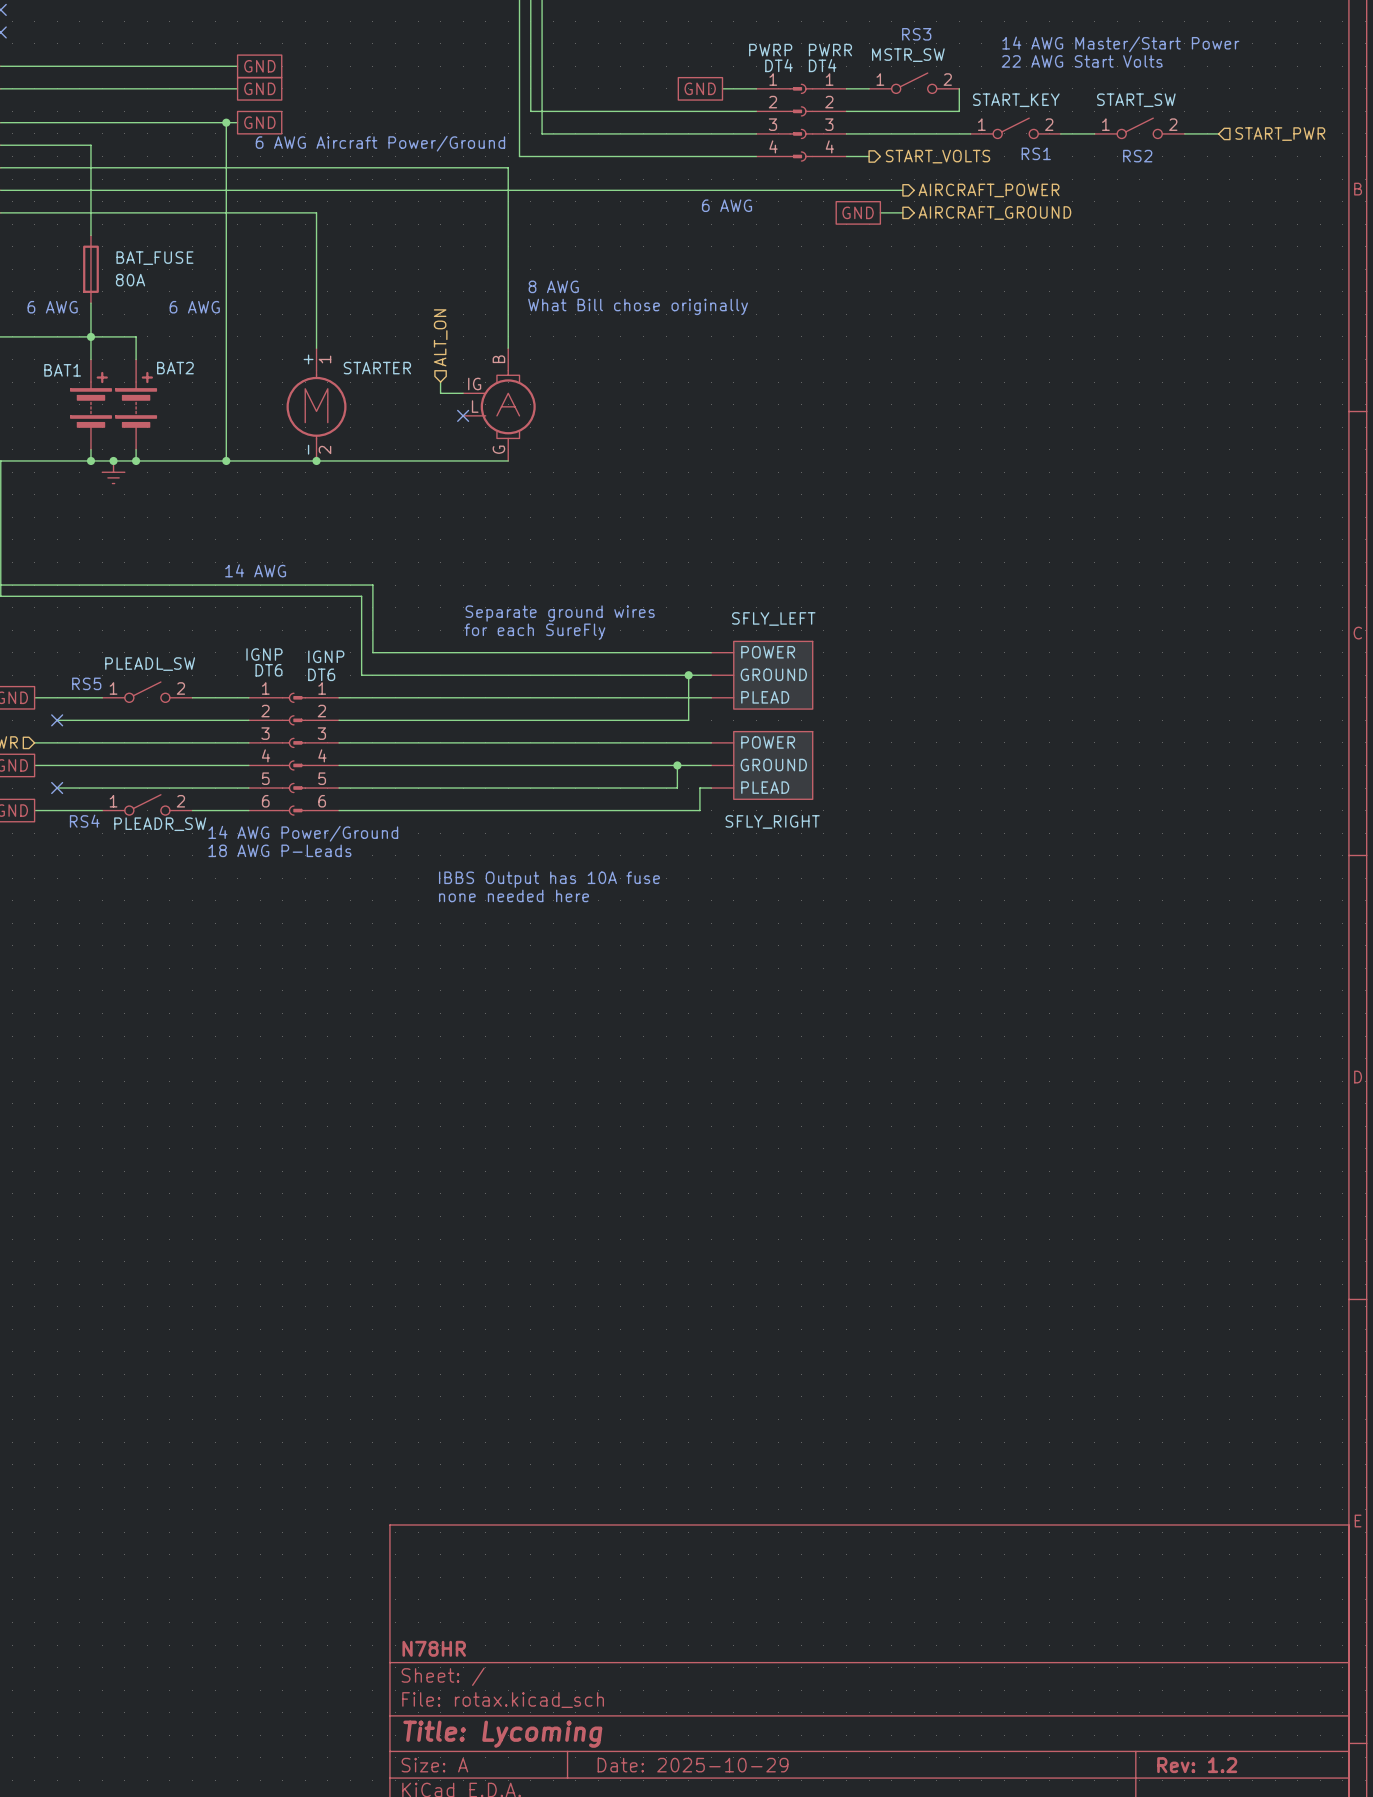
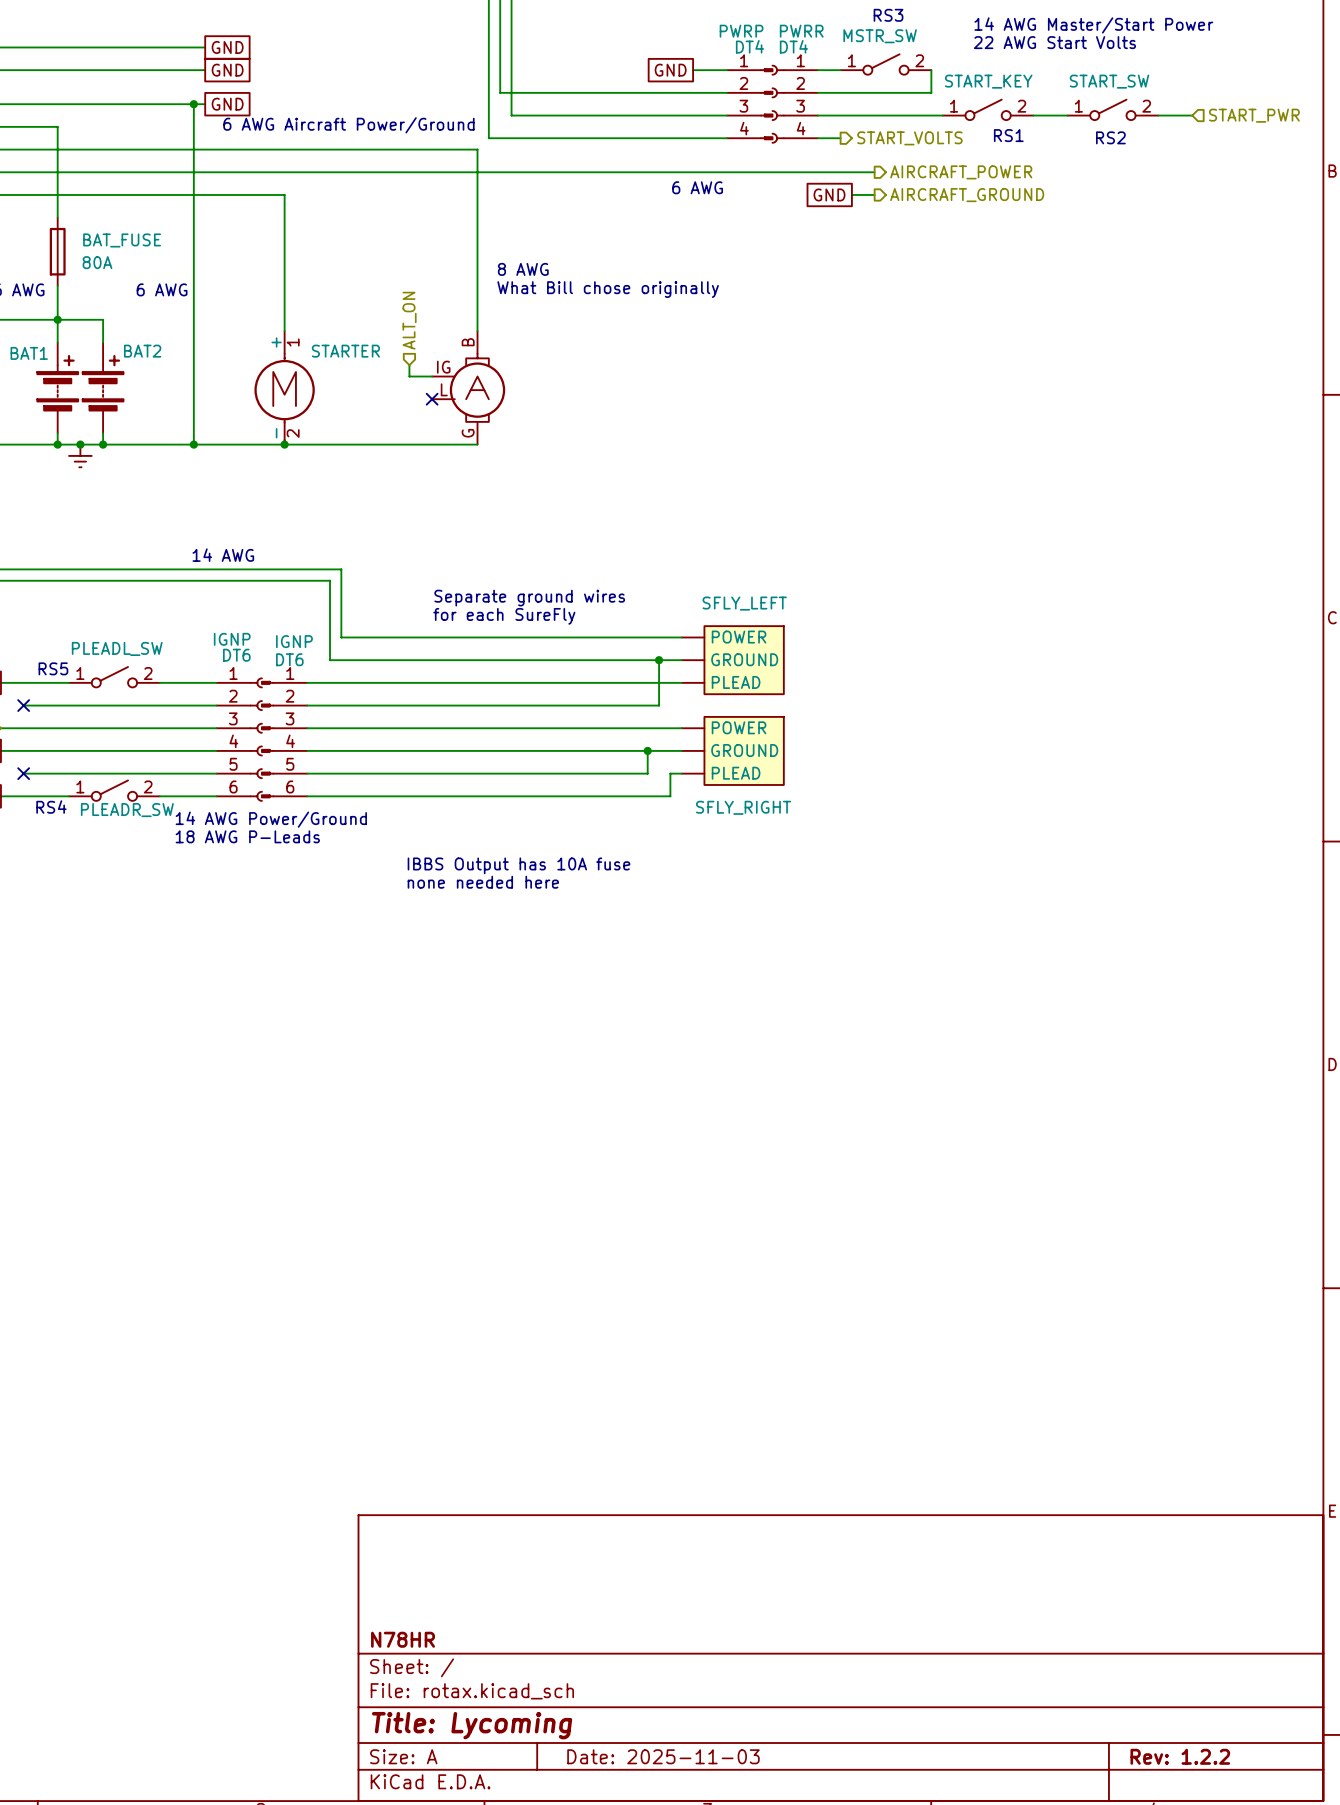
title block: Date: 2025-10-29 (693, 1765) -> Date: 2025-11-03 (663, 1756)
title block: Rev: 1.2 (1197, 1765) -> Rev: 1.2.2 (1180, 1756)

